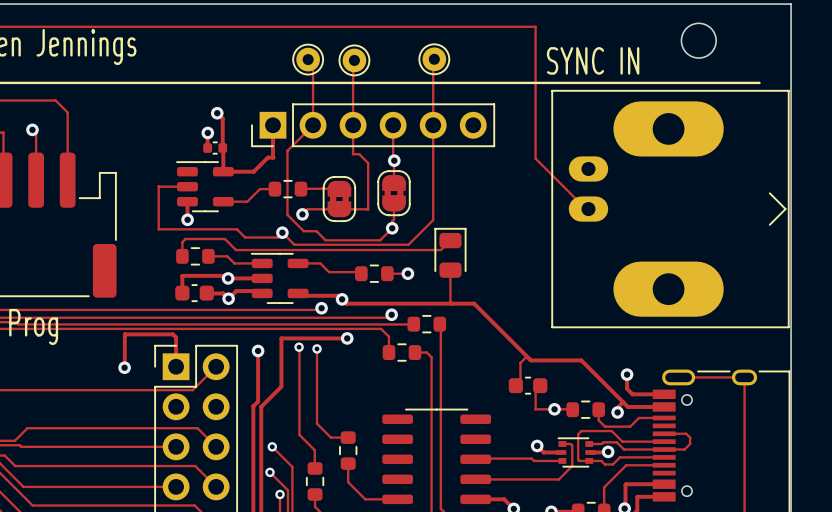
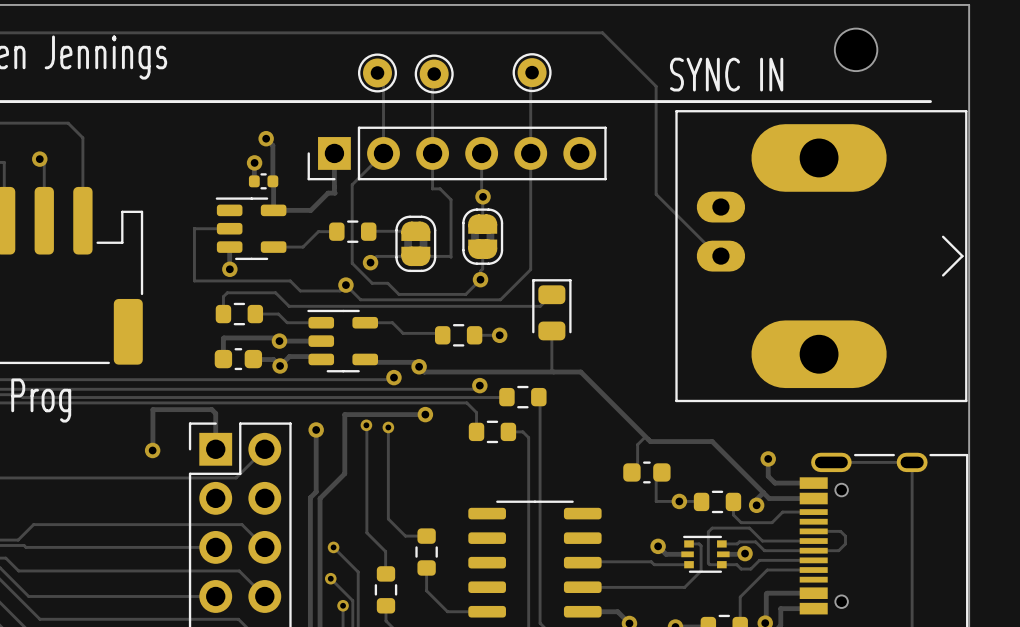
track: (491, 26) (535, 26) (535, 70) -> (602, 32) (656, 86)

